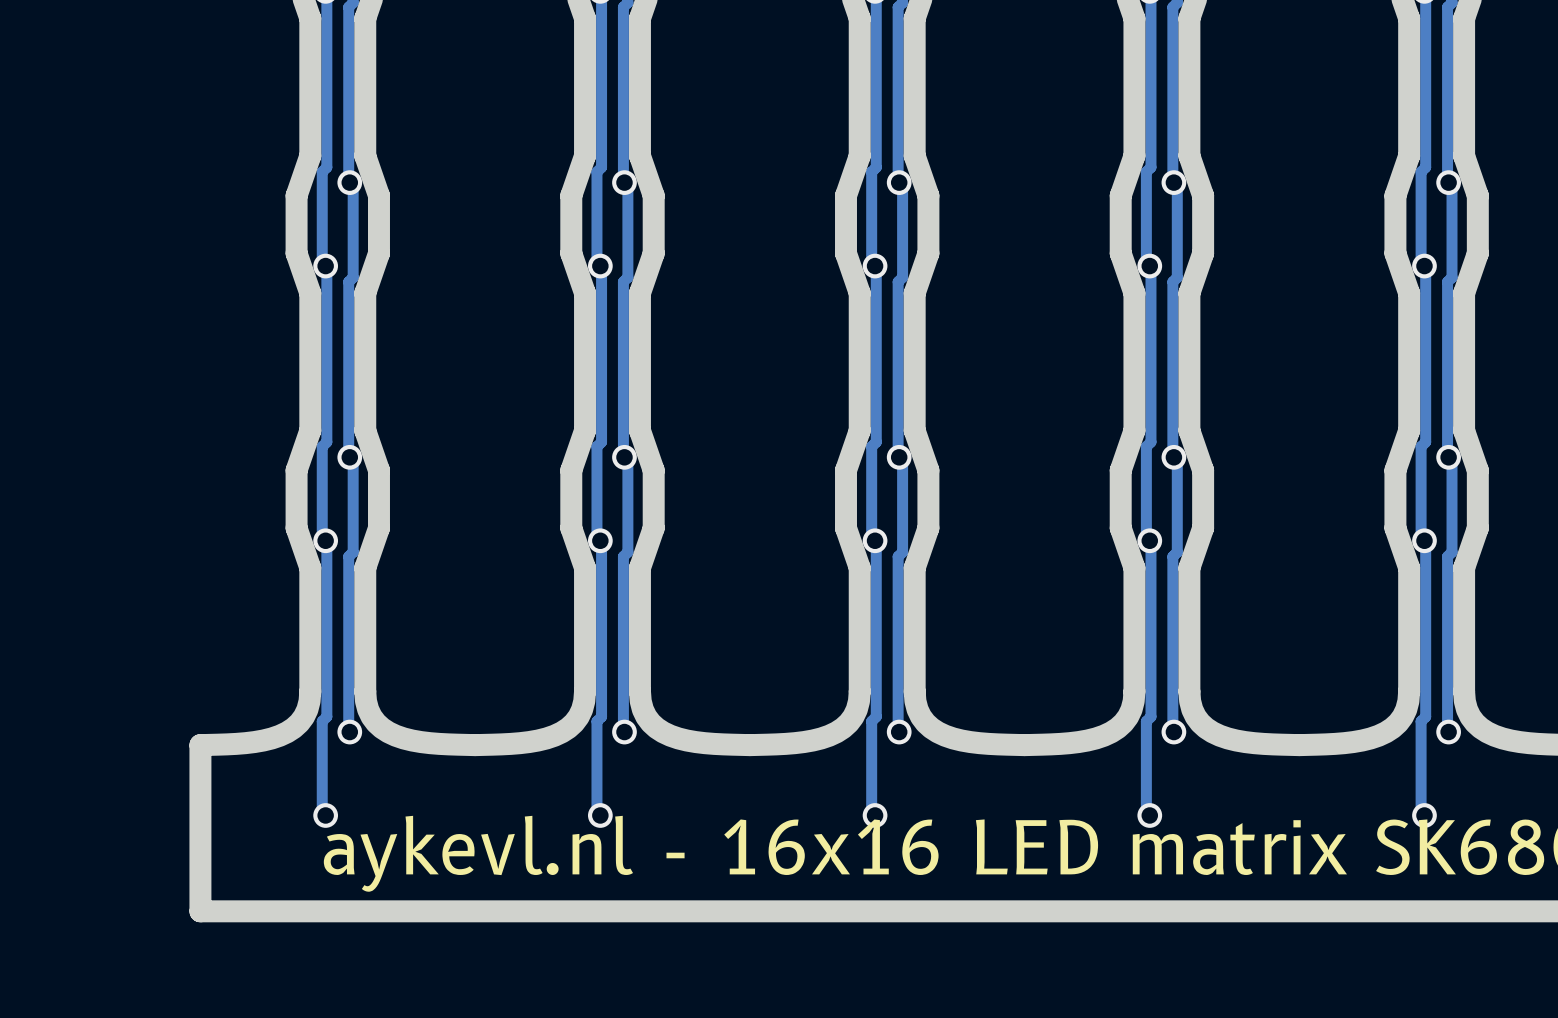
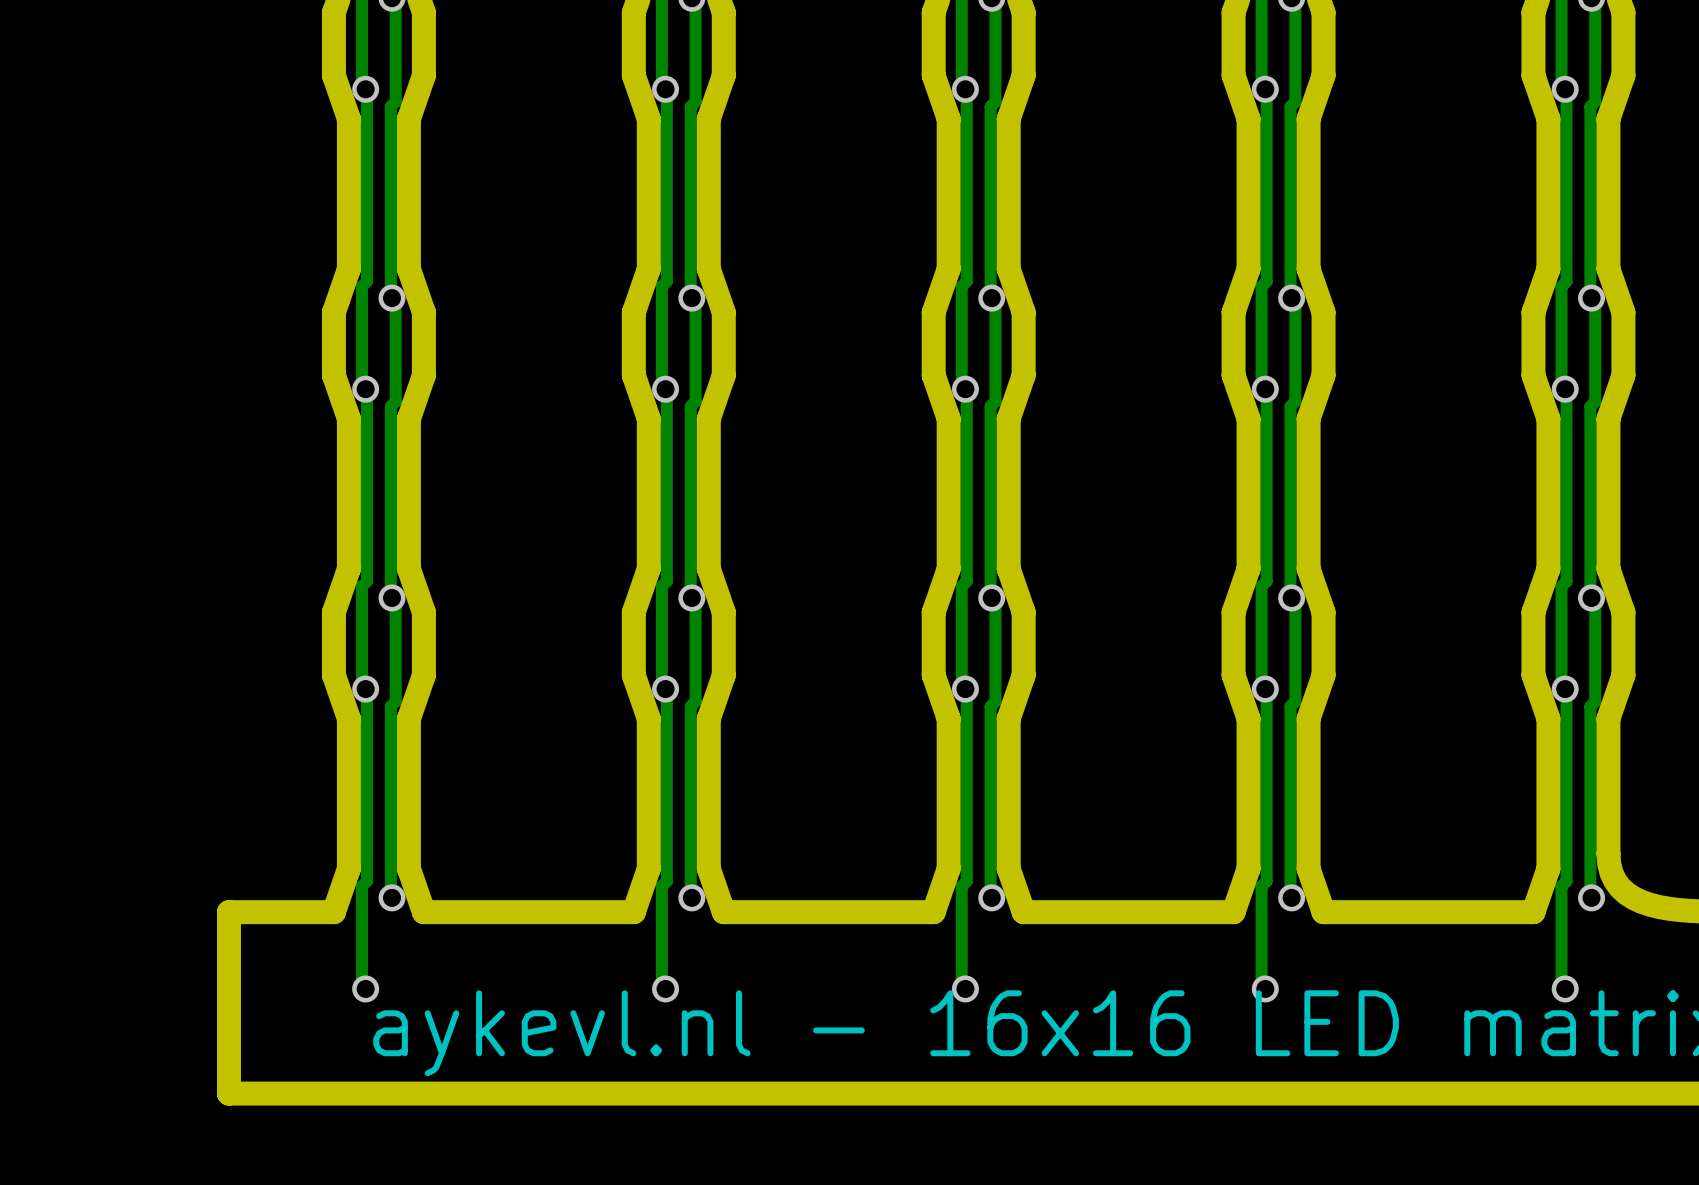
board edge: (310, 691) (309, 701) (303, 716) (287, 732) (254, 742) (200, 745) -> (348, 853) (348, 868) (333, 912) (228, 912)
board edge: (585, 691) (584, 701) (578, 716) (561, 732) (529, 742) (475, 745) (421, 742) (388, 732) (371, 716) (366, 701) (365, 691) -> (648, 853) (648, 868) (633, 912) (423, 912) (408, 868) (408, 853)
board edge: (859, 691) (858, 701) (853, 716) (836, 732) (803, 742) (749, 745) (695, 742) (663, 732) (646, 716) (640, 701) (639, 691) -> (948, 853) (948, 868) (933, 912) (723, 912) (708, 868) (708, 853)
board edge: (1134, 691) (1133, 701) (1128, 716) (1111, 732) (1078, 742) (1024, 745) (970, 742) (937, 732) (921, 716) (915, 701) (914, 691) -> (1248, 853) (1248, 868) (1233, 912) (1023, 912) (1008, 868) (1008, 853)
board edge: (1409, 691) (1408, 701) (1402, 716) (1385, 732) (1353, 742) (1299, 745) (1245, 742) (1212, 732) (1195, 716) (1190, 701) (1189, 691) -> (1548, 853) (1548, 868) (1533, 912) (1323, 912) (1308, 868) (1308, 853)

